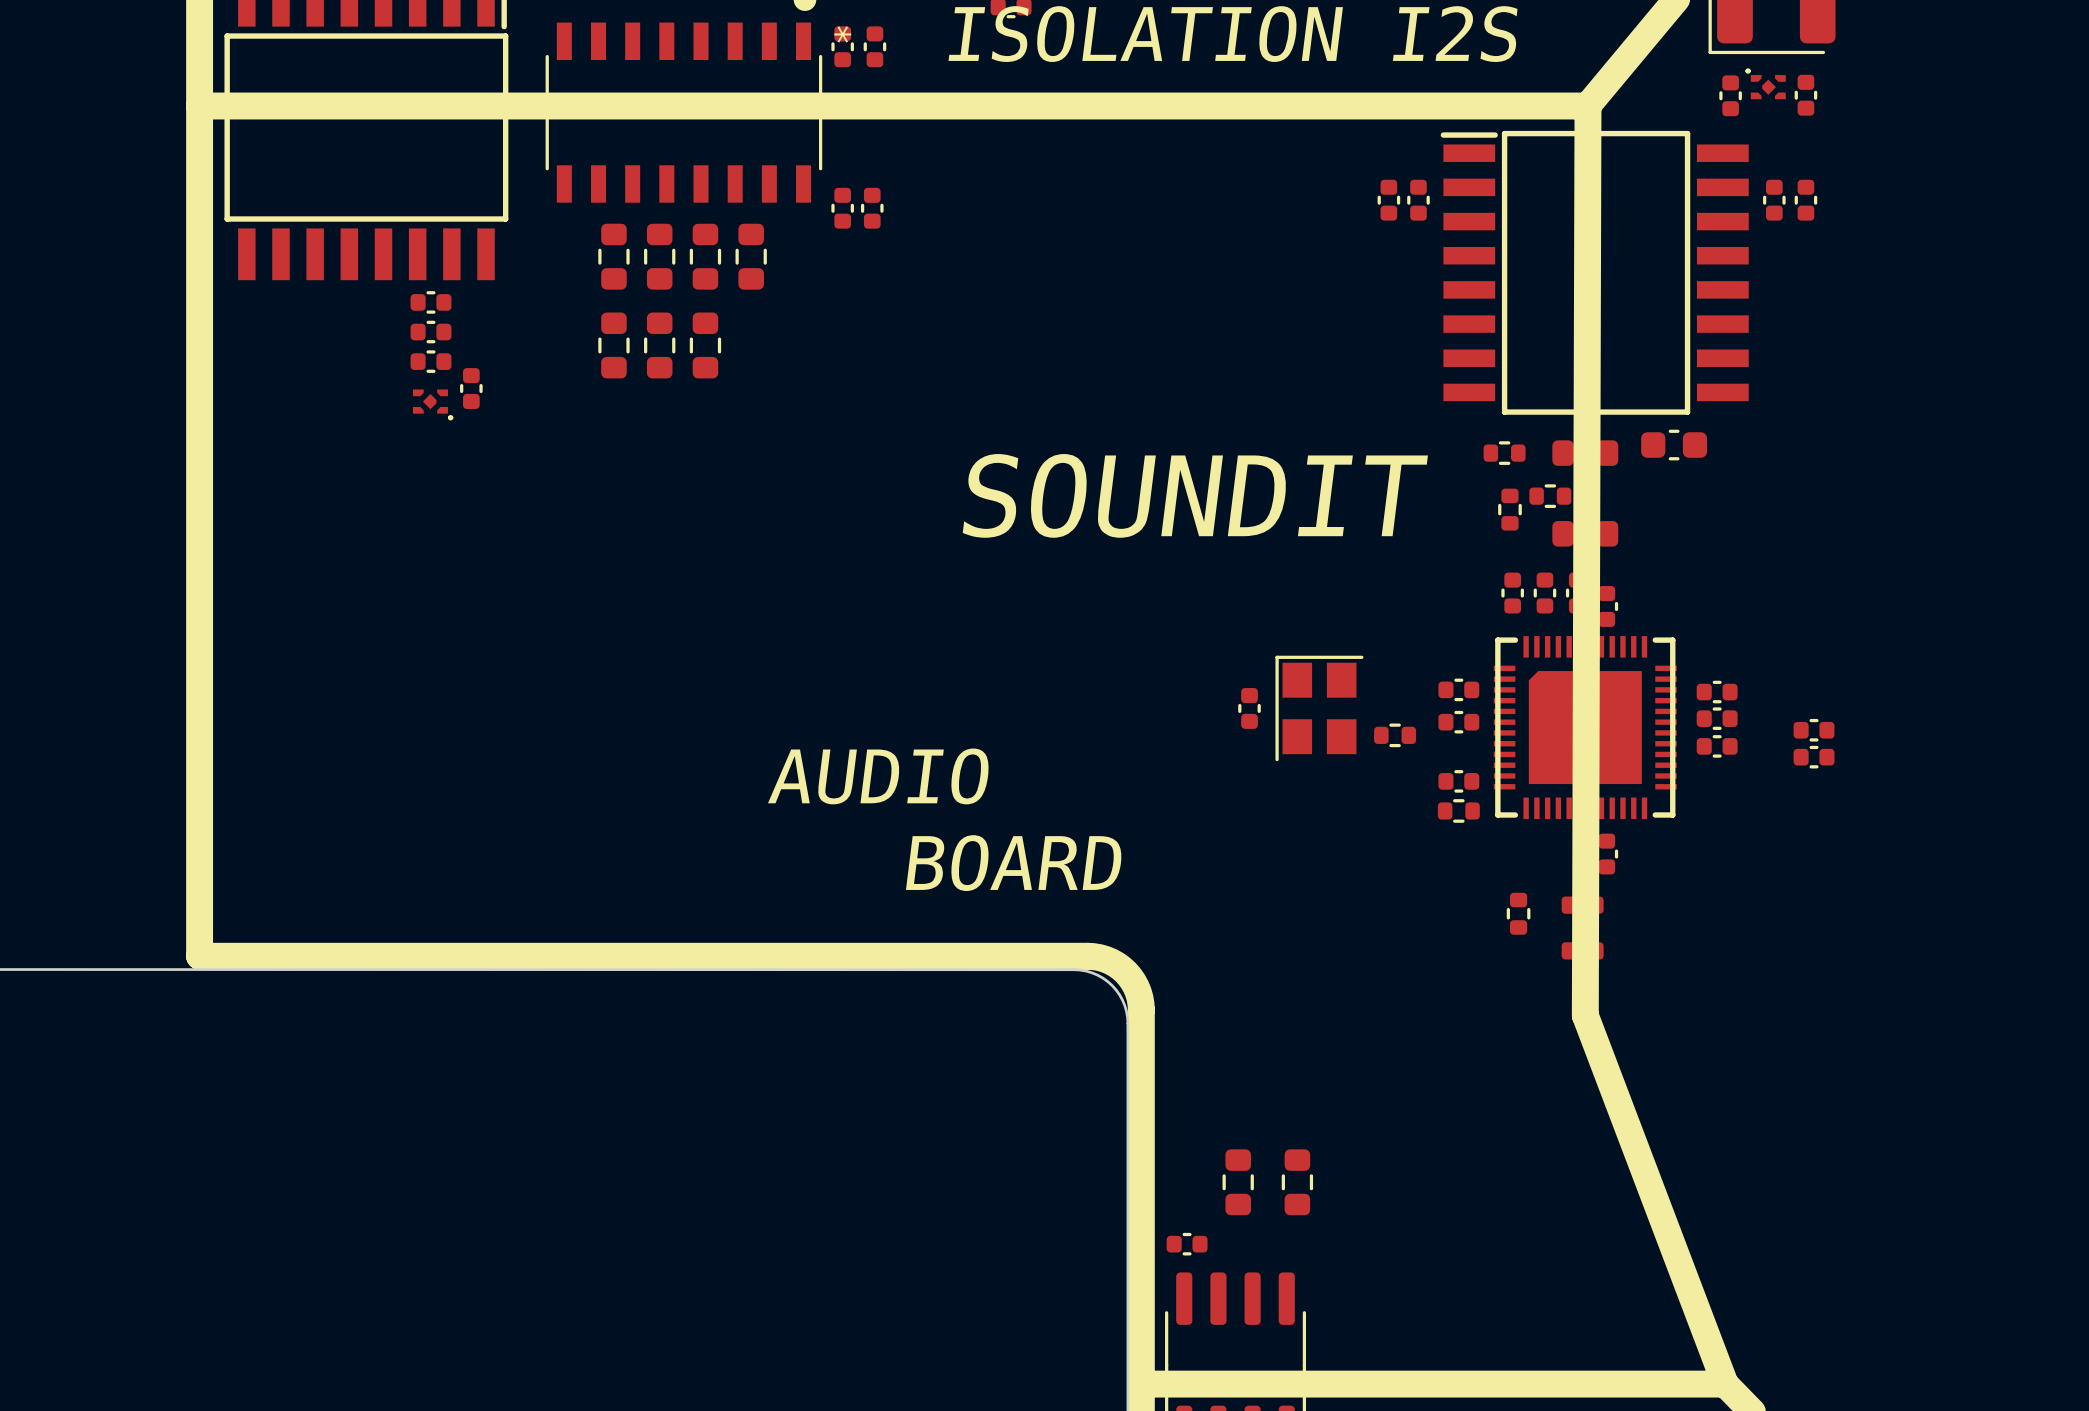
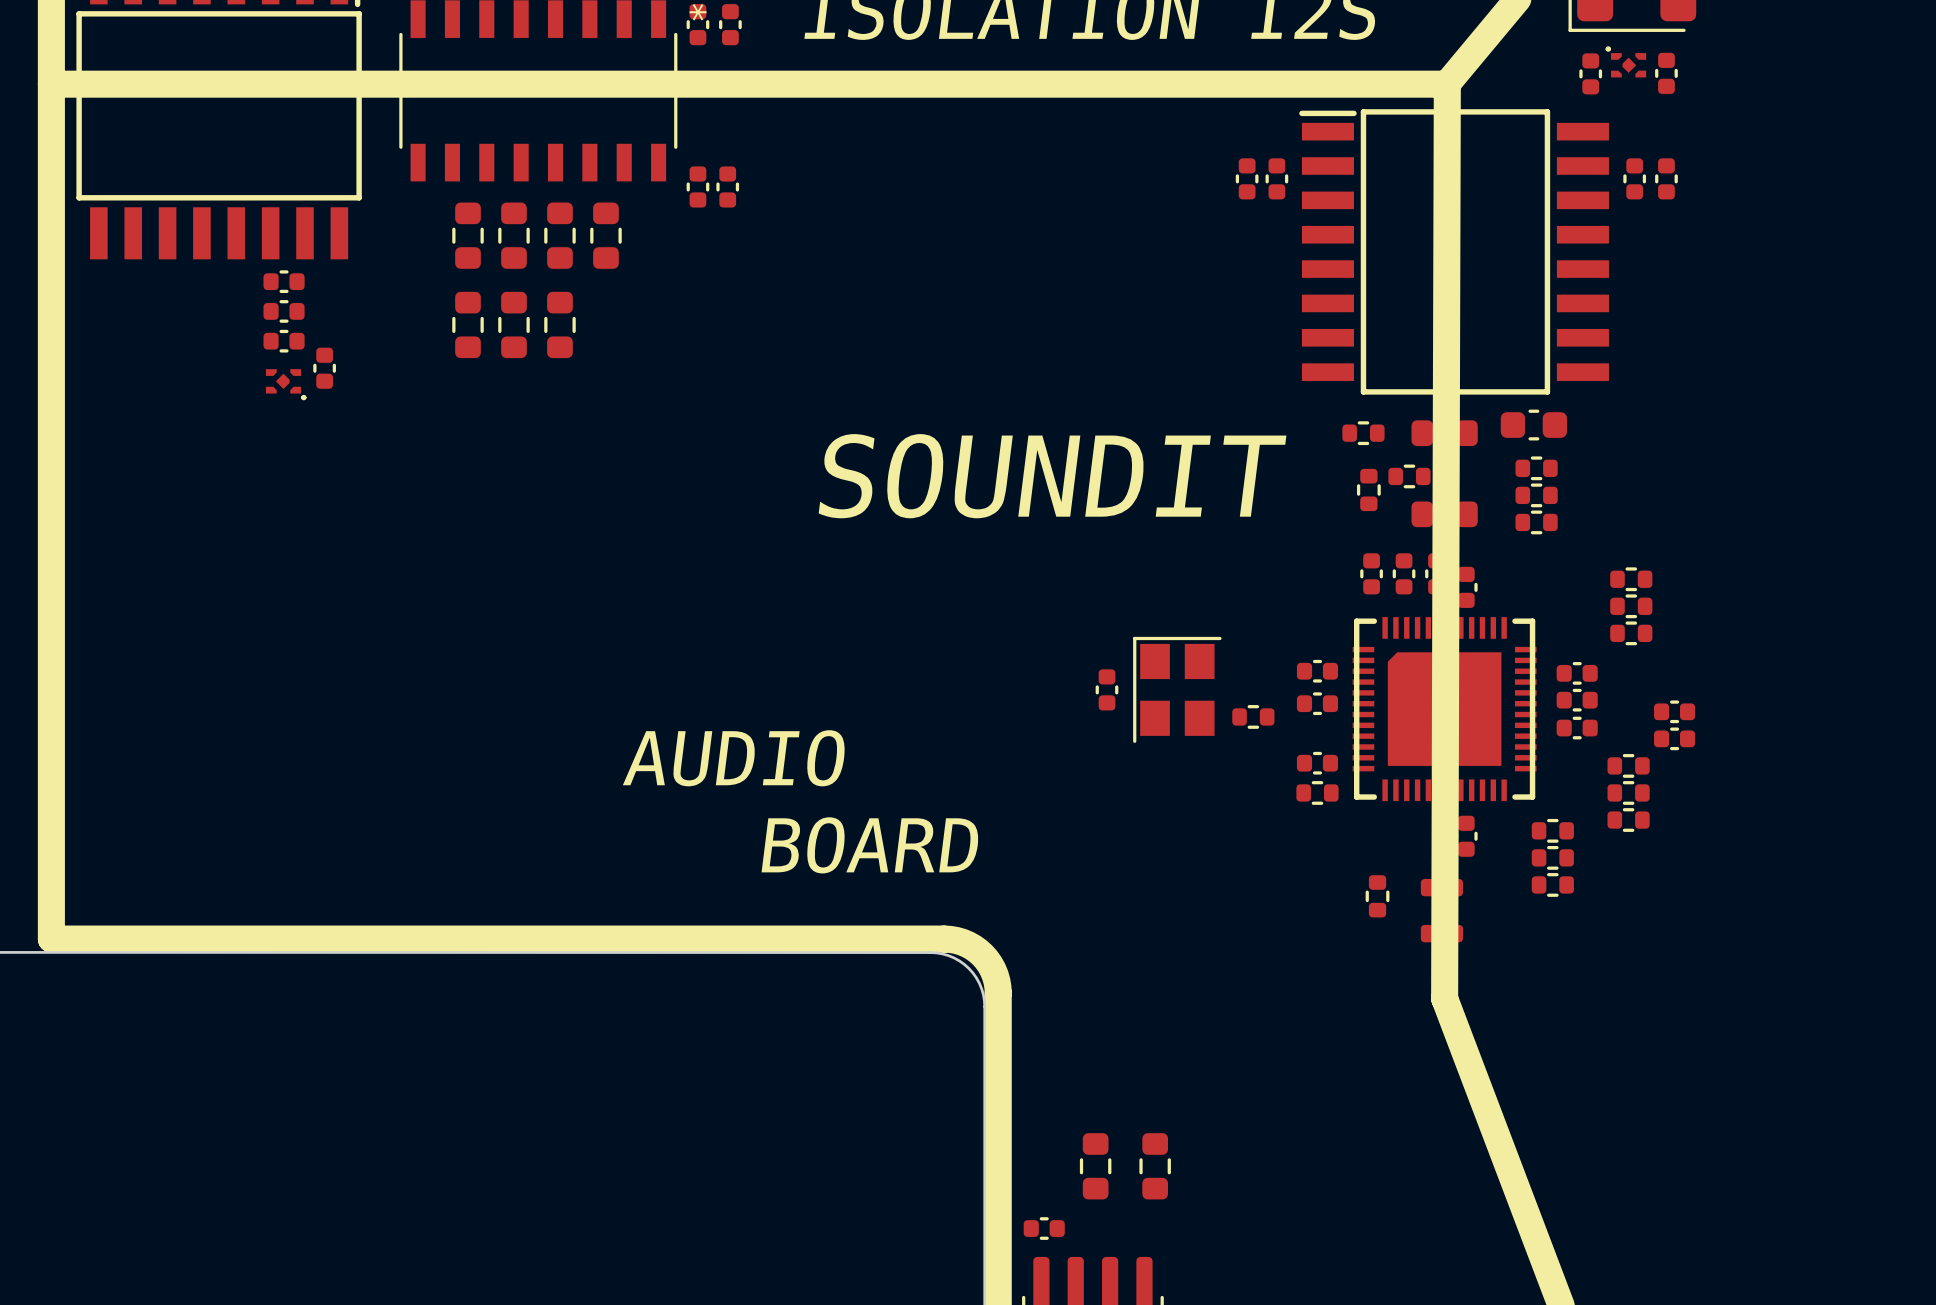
part: none -> (1536, 468)
part: none -> (1536, 495)
part: none -> (1536, 522)
part: none -> (1631, 579)
part: none -> (1631, 606)
part: none -> (1631, 633)
part: none -> (1628, 765)
part: none -> (1628, 792)
part: none -> (1628, 820)
part: none -> (1552, 830)
part: none -> (1552, 857)
part: none -> (1552, 884)

